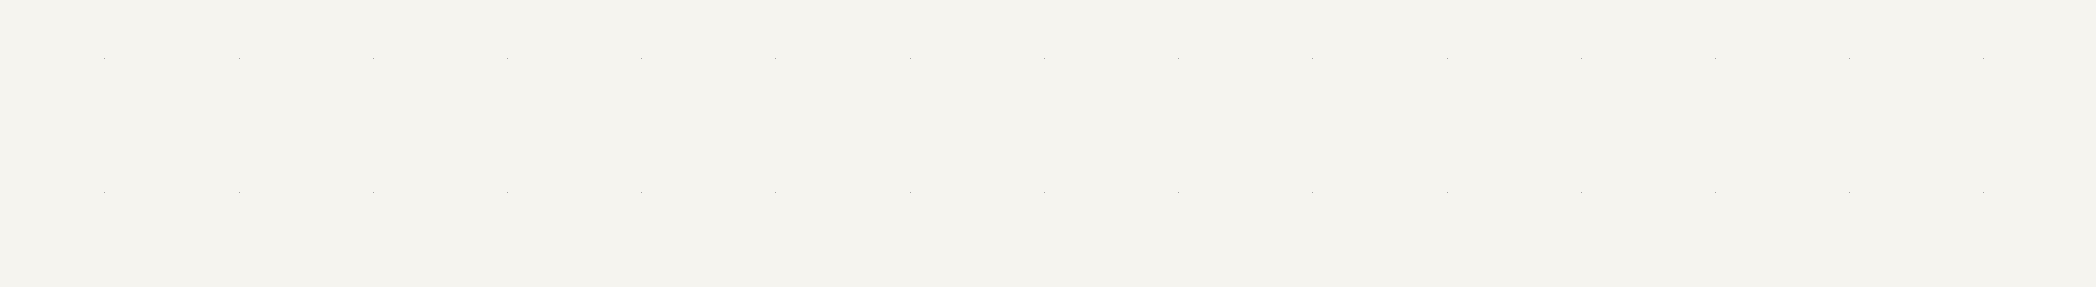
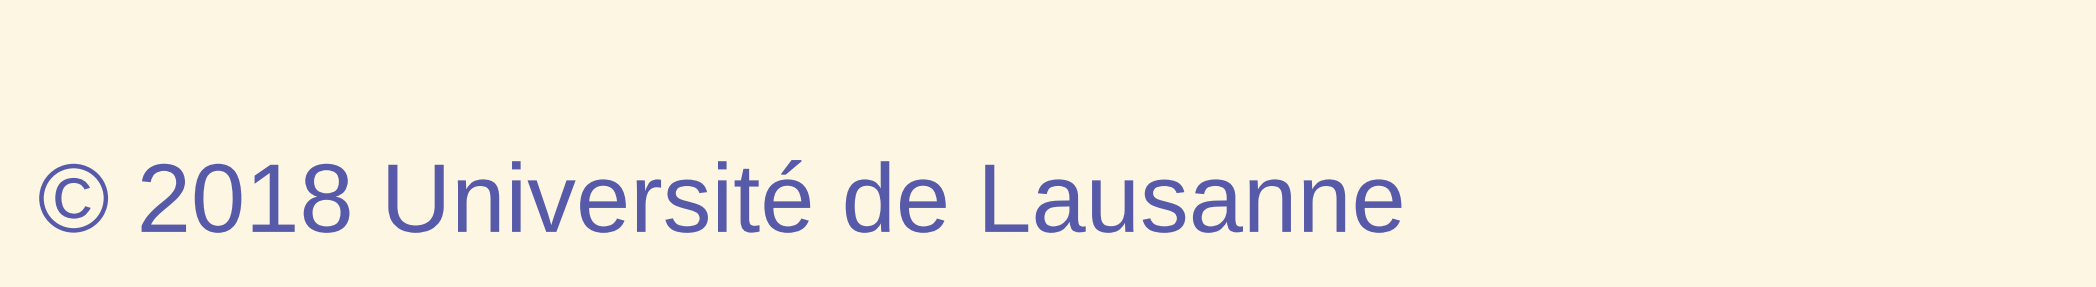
text: none -> © 2018 Université de Lausanne (720, 196)

